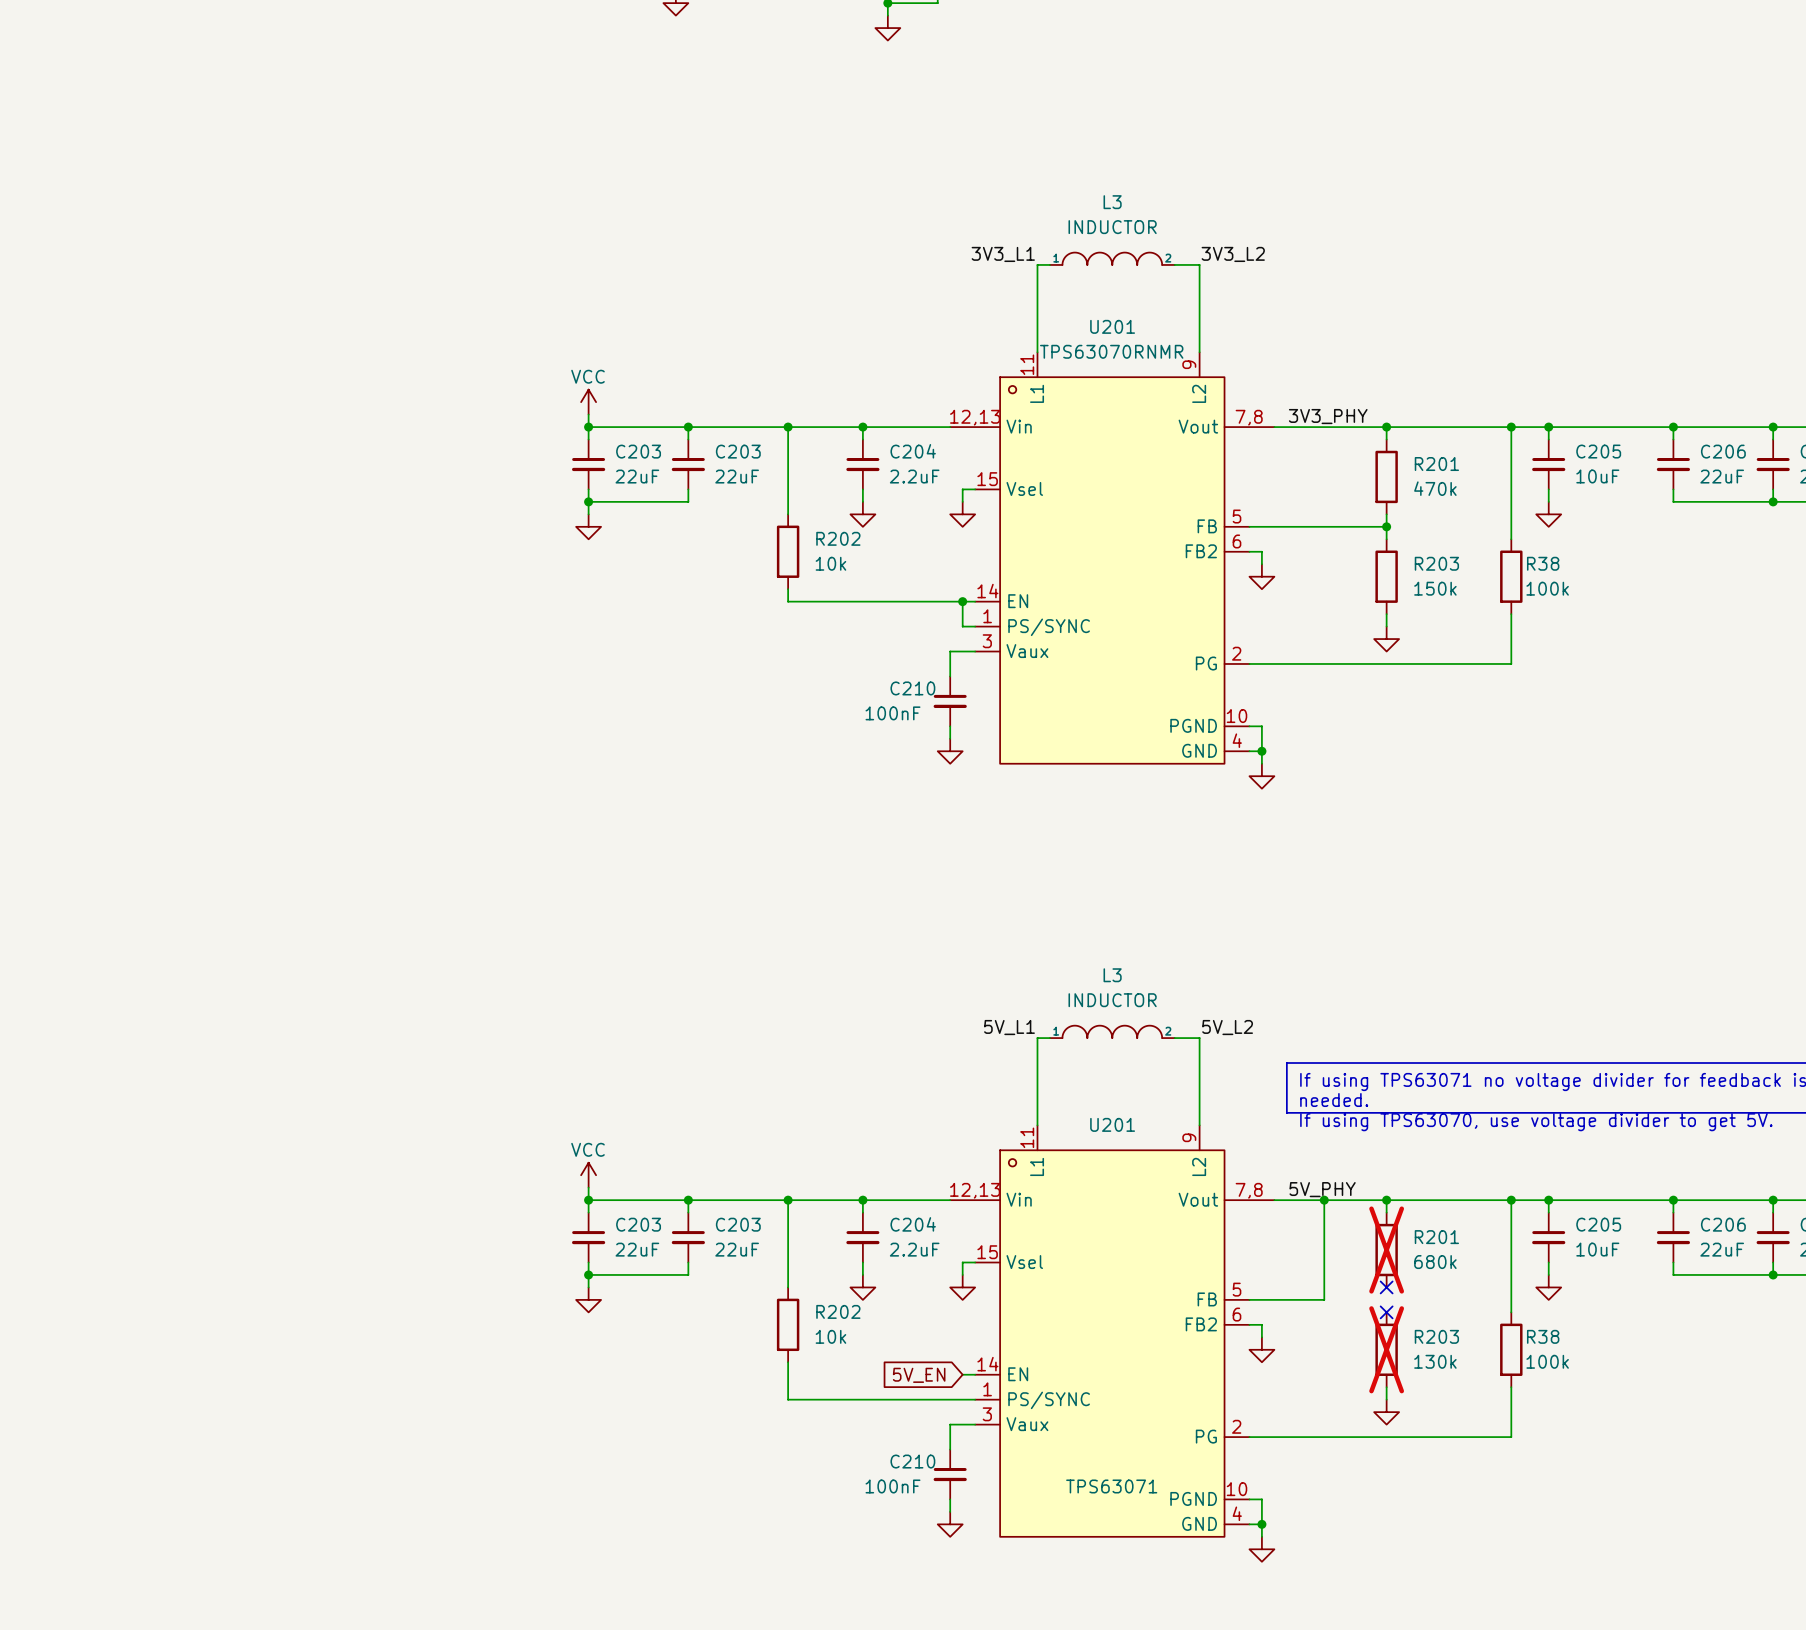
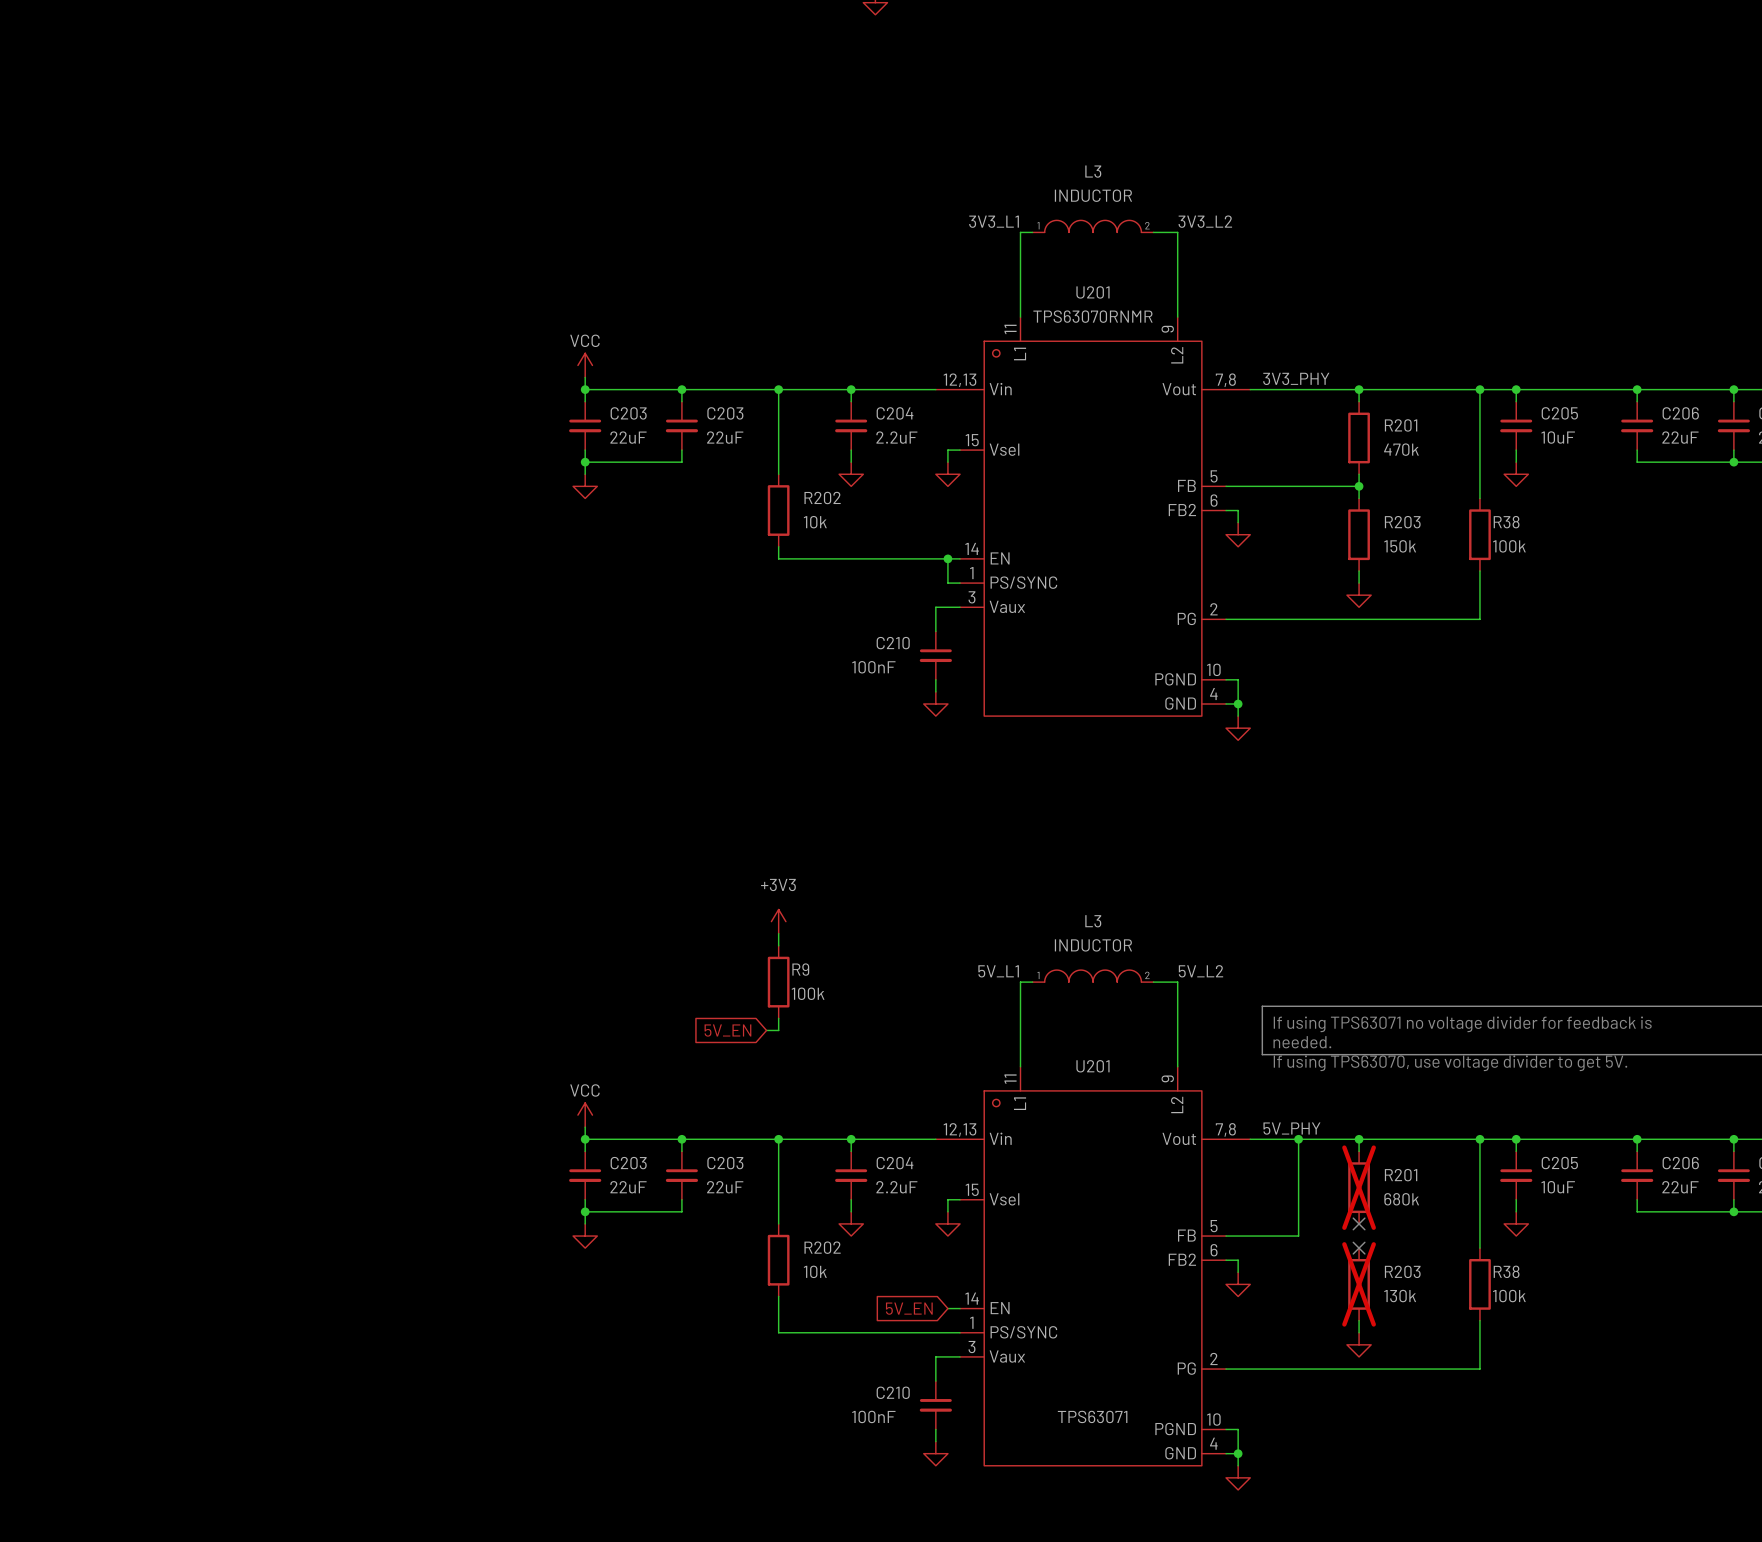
power symbol: none -> +3V3 (778, 921)
wire: none -> (778, 933) (778, 945)
R9: none -> 100k (778, 982)
wire: none -> (778, 1018) (778, 1030) (766, 1030)
global label: none -> 5V_EN (727, 1030)

